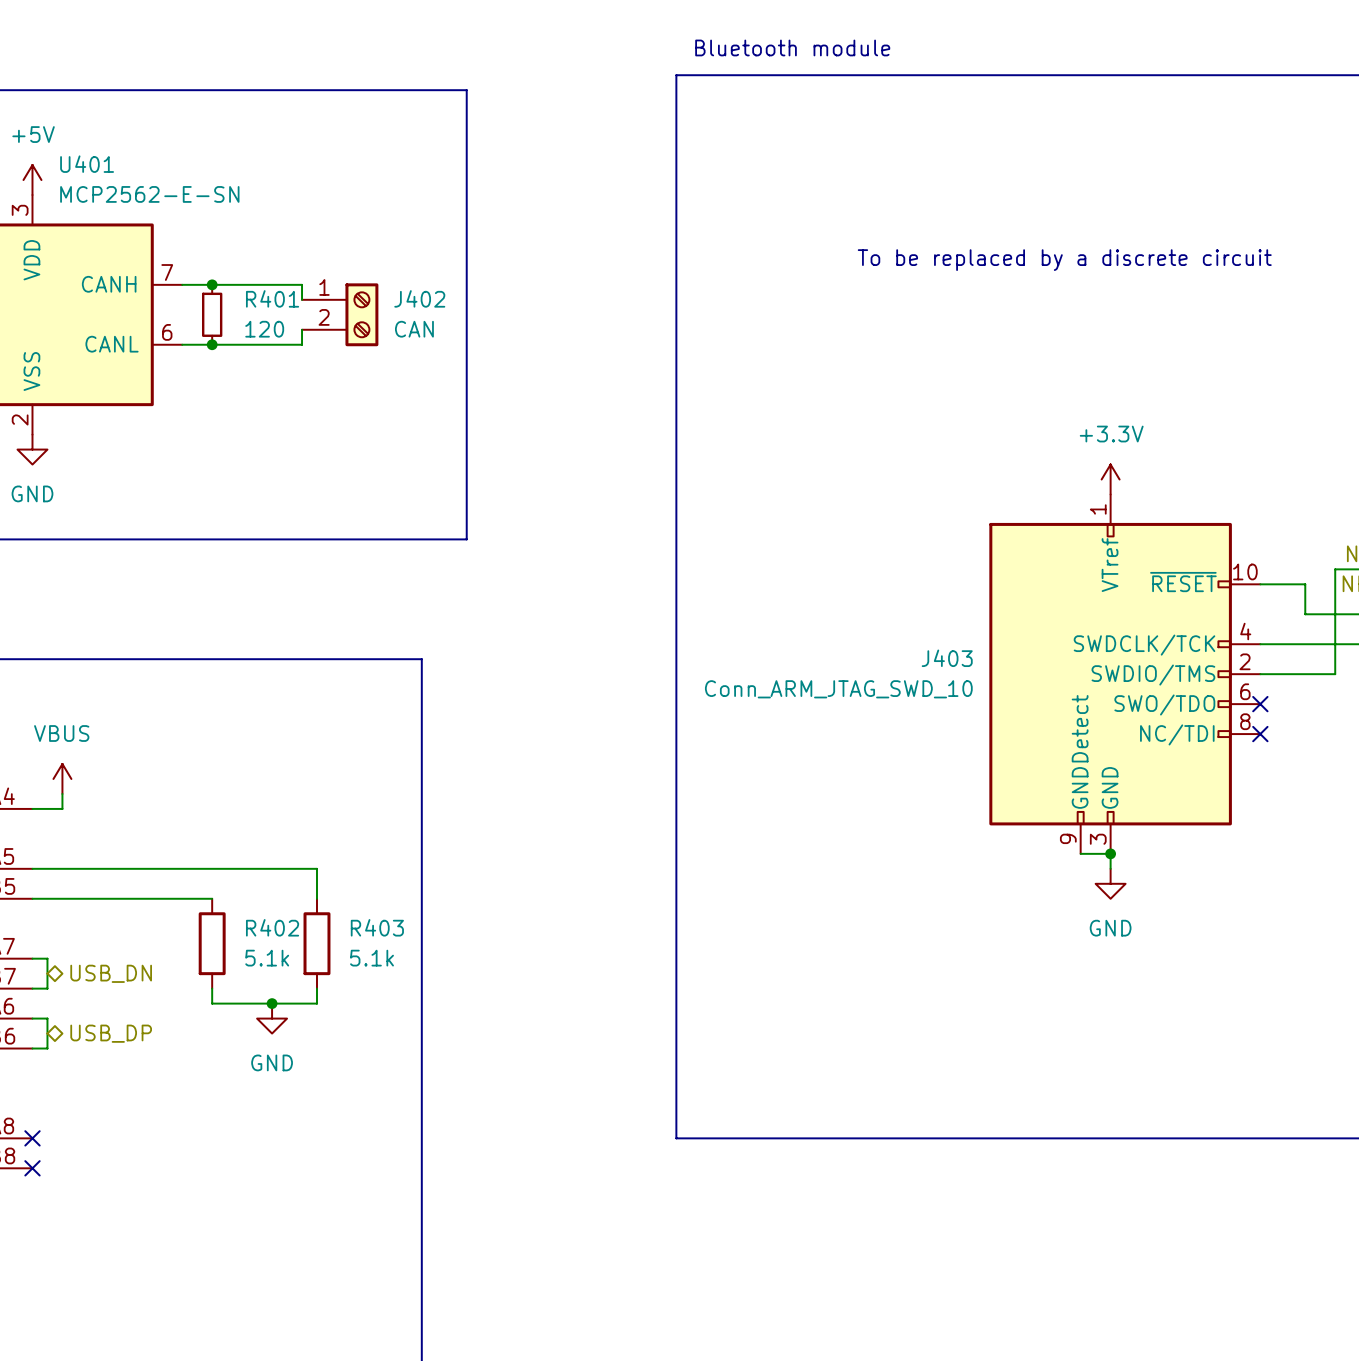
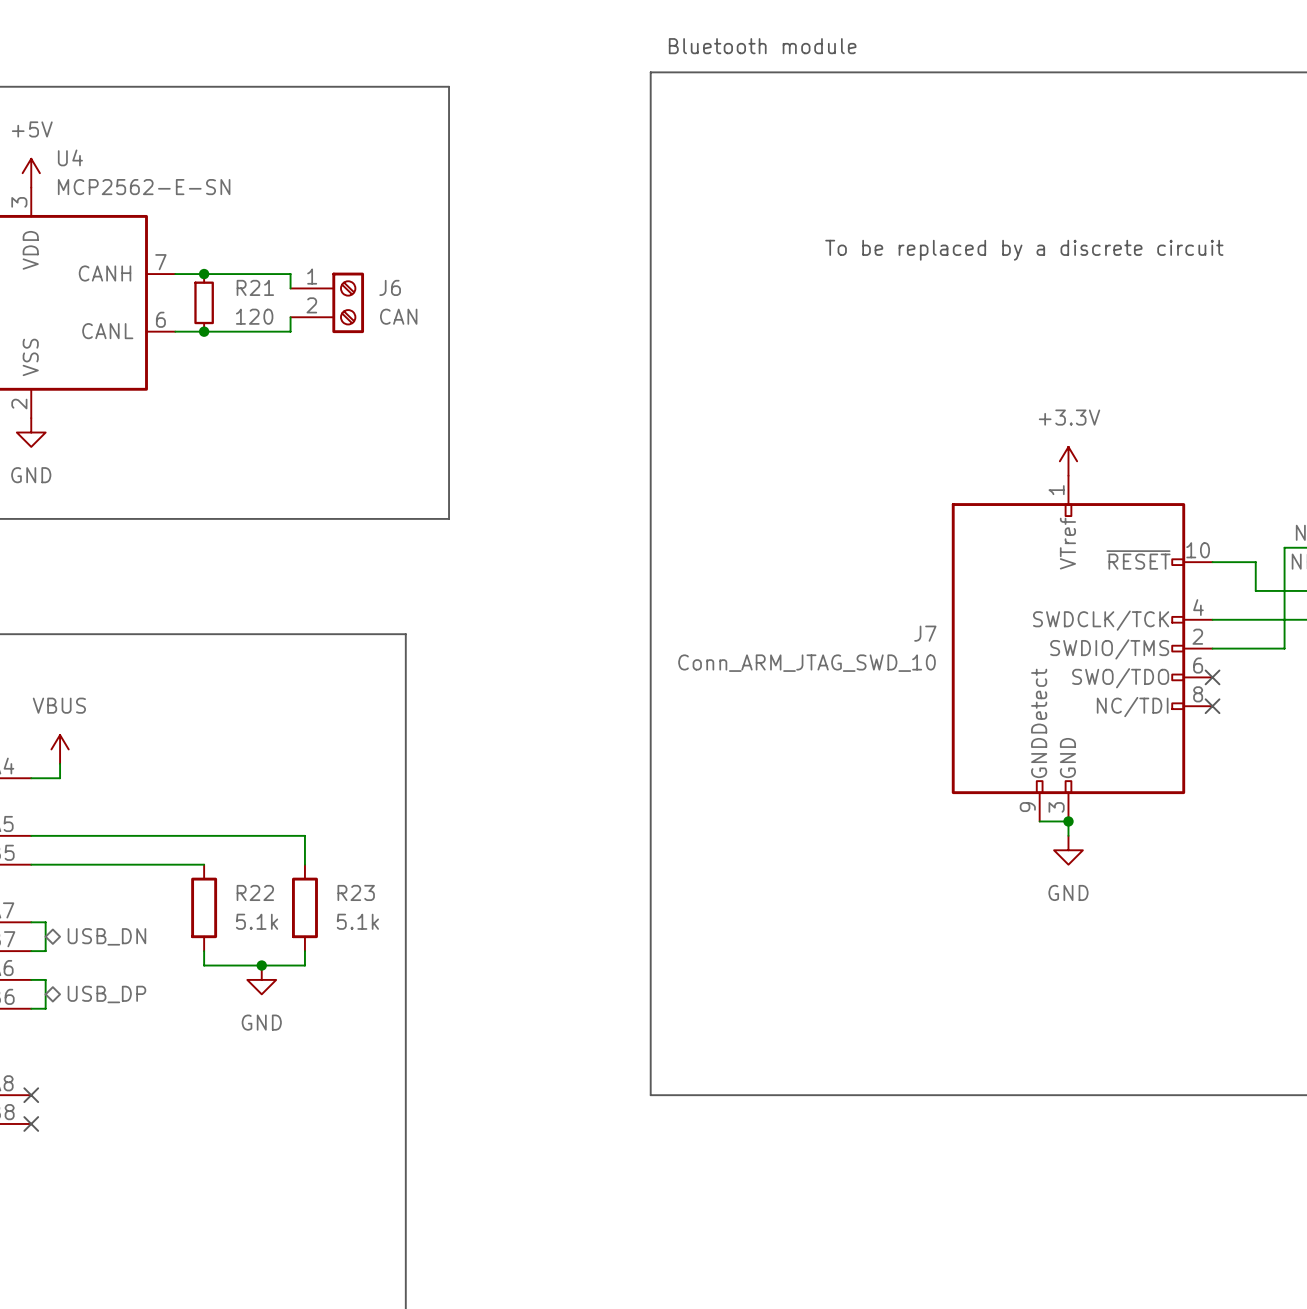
U401 name: U401 (87, 164) -> U4 (70, 157)
R401 name: R401 (272, 298) -> R21 (255, 287)
J402 name: J402 (419, 298) -> J6 (390, 287)
J403 name: J403 (947, 658) -> J7 (925, 633)
R402 name: R402 (272, 927) -> R22 (255, 892)
R403 name: R403 (377, 927) -> R23 (356, 892)

